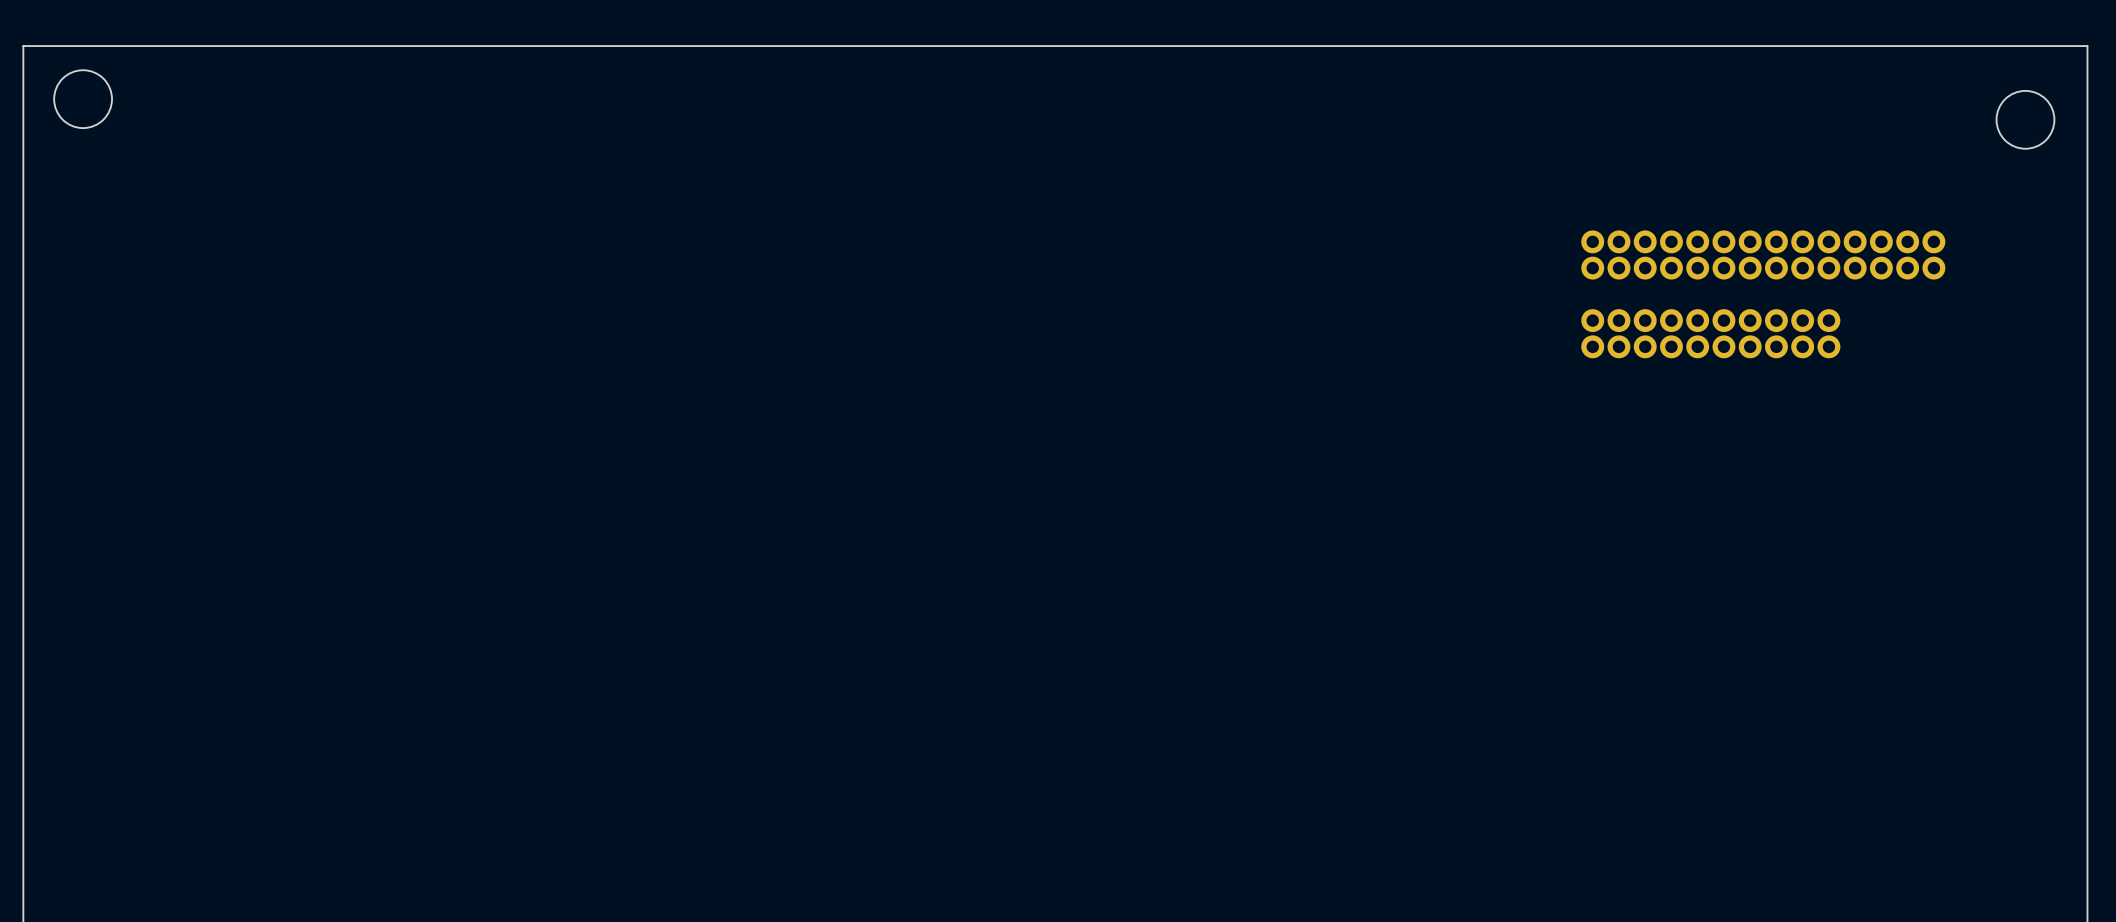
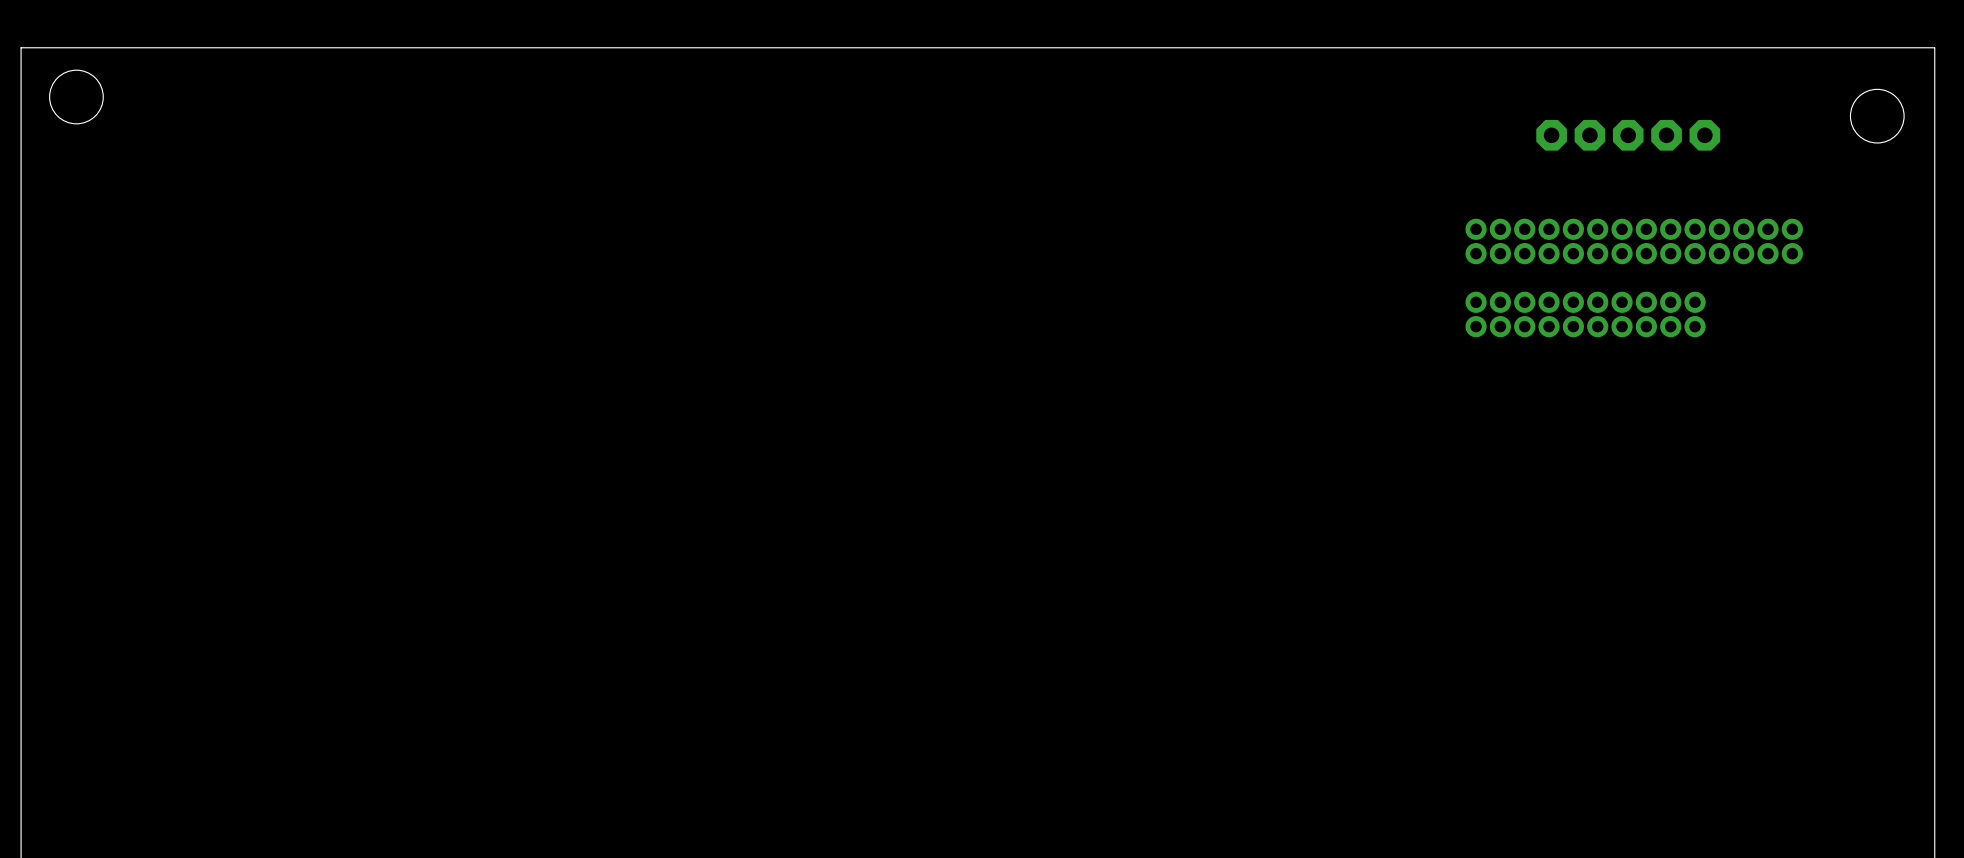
part: none -> (1551, 135)
part: none -> (1589, 135)
part: none -> (1628, 135)
part: none -> (1666, 135)
part: none -> (1704, 135)

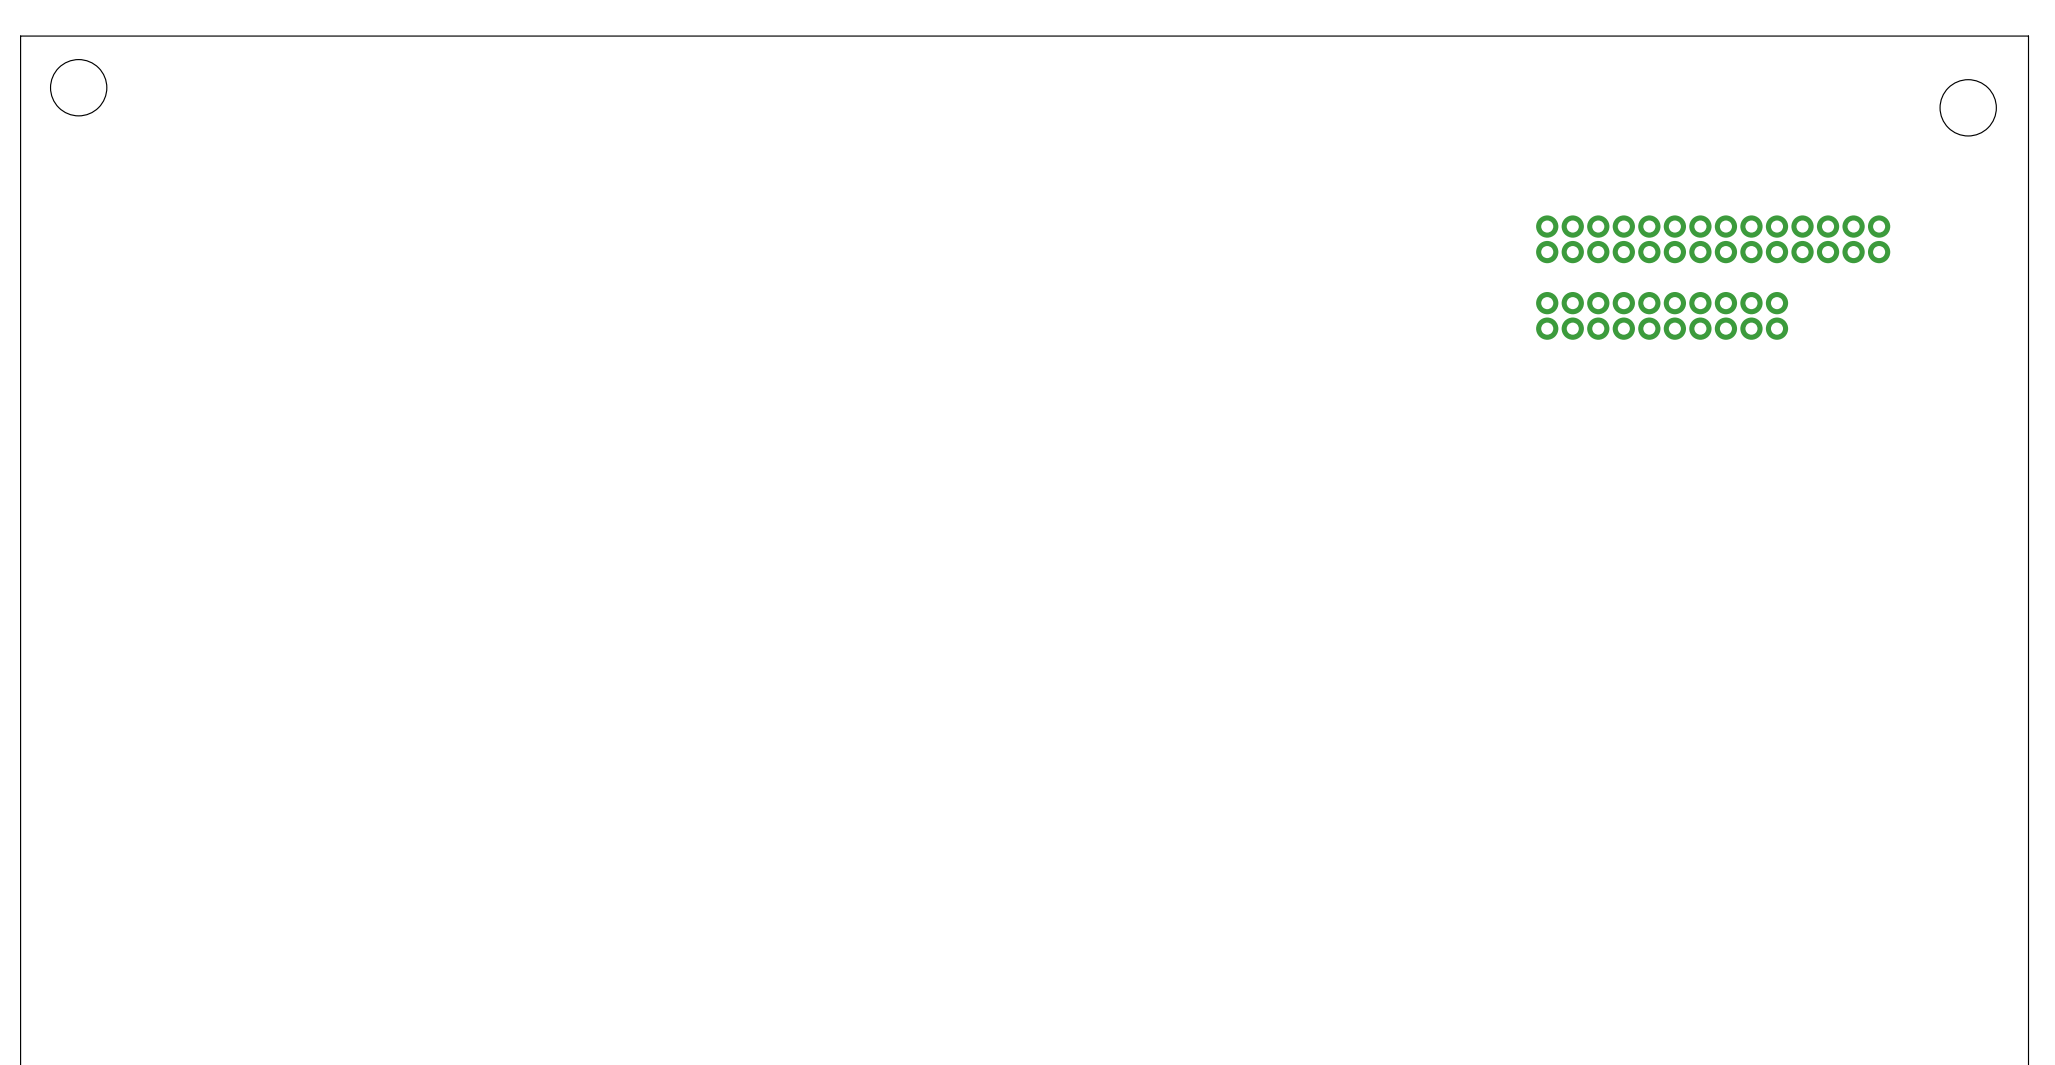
part: (1551, 135) -> none
part: (1589, 135) -> none
part: (1628, 135) -> none
part: (1666, 135) -> none
part: (1704, 135) -> none

